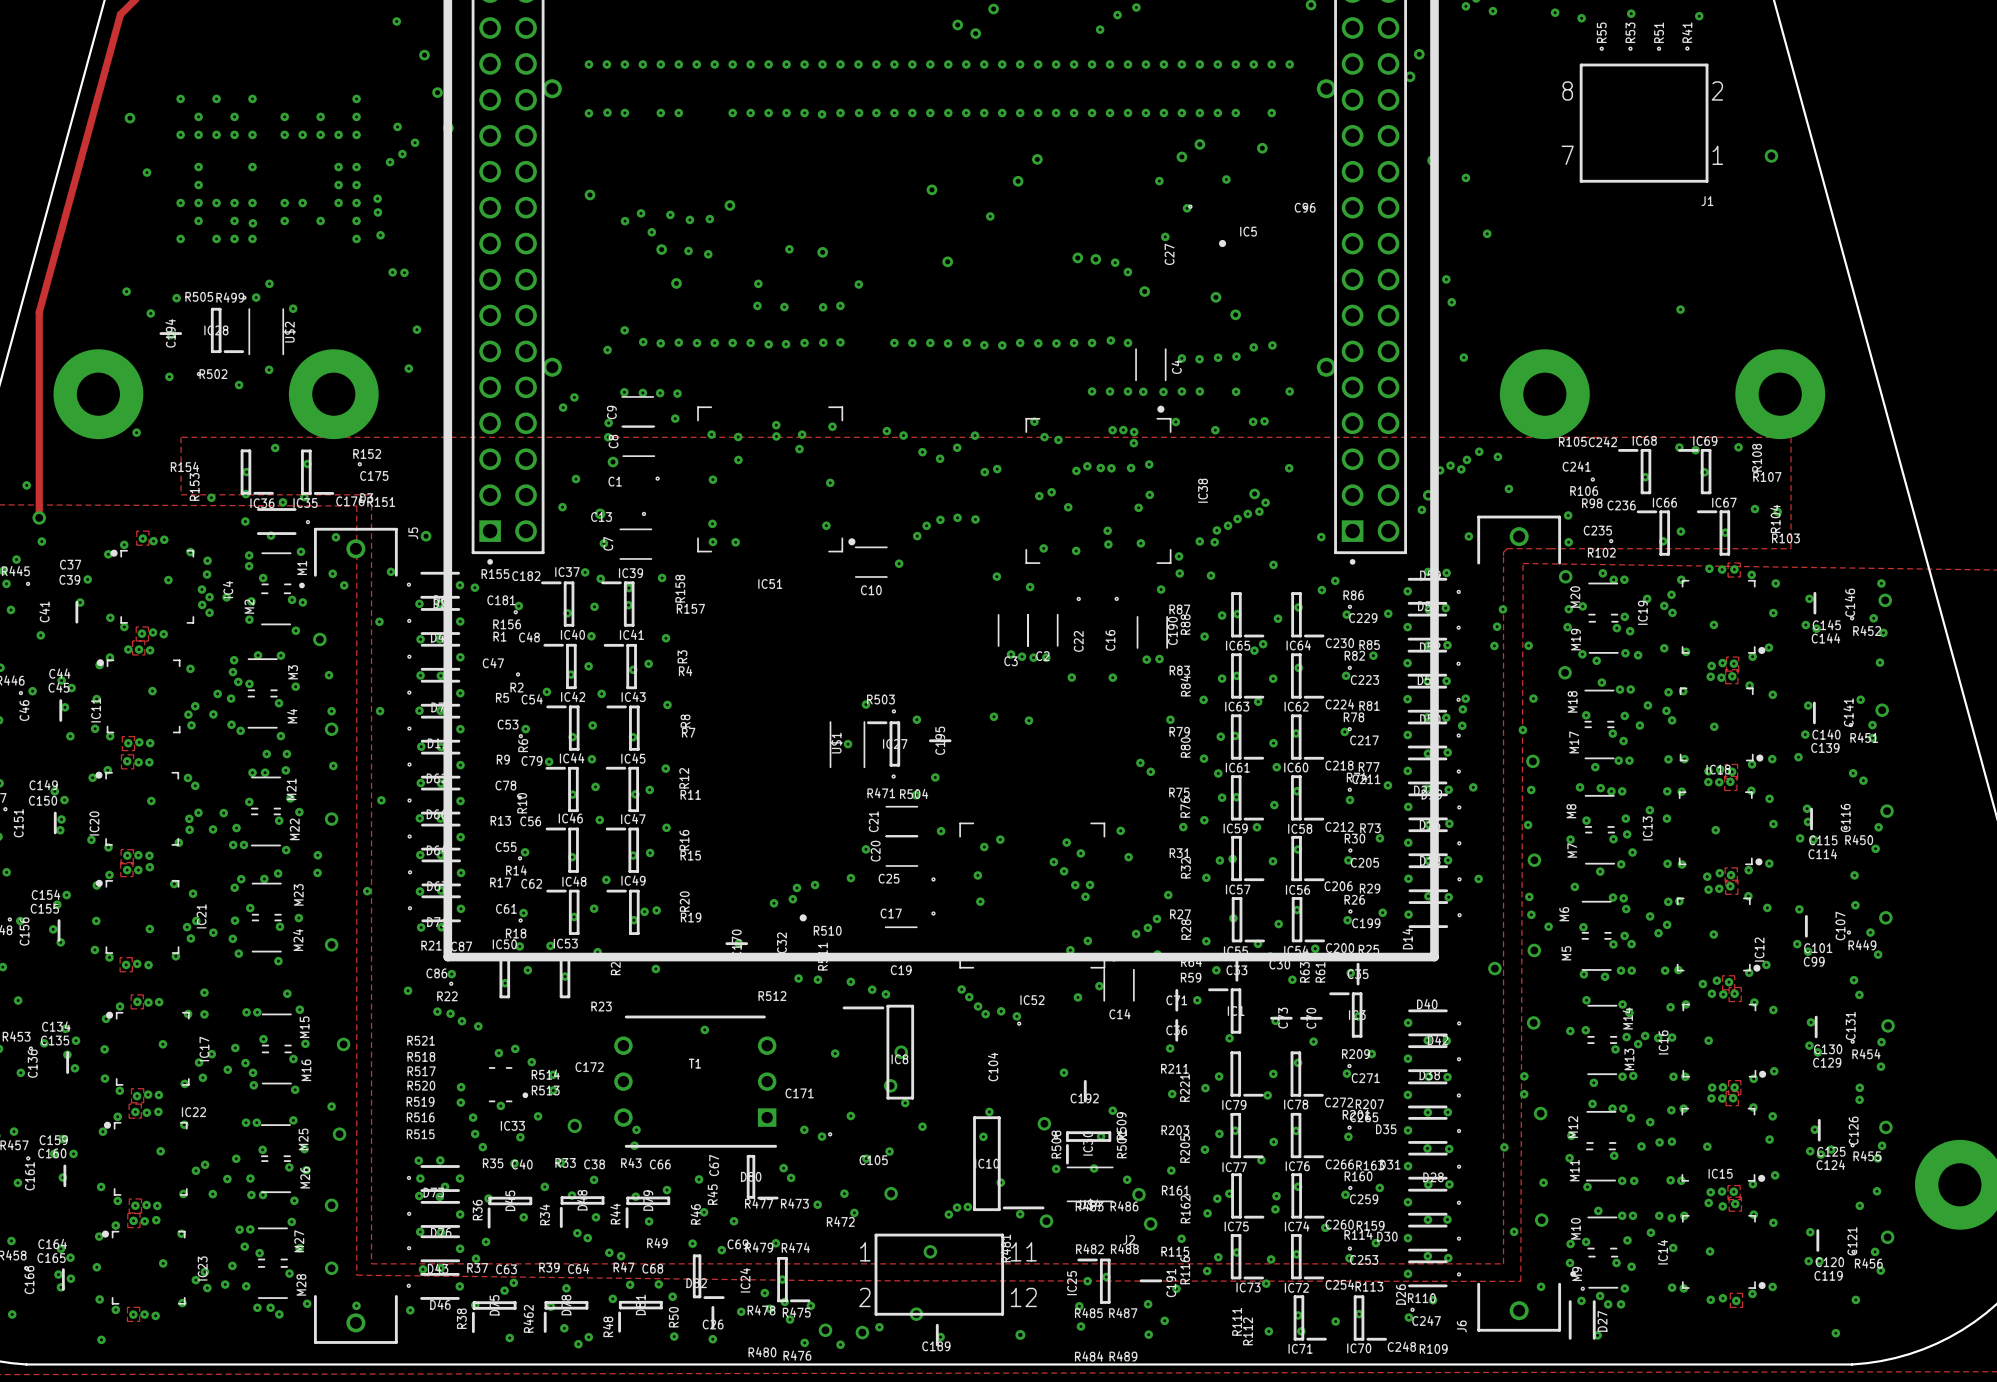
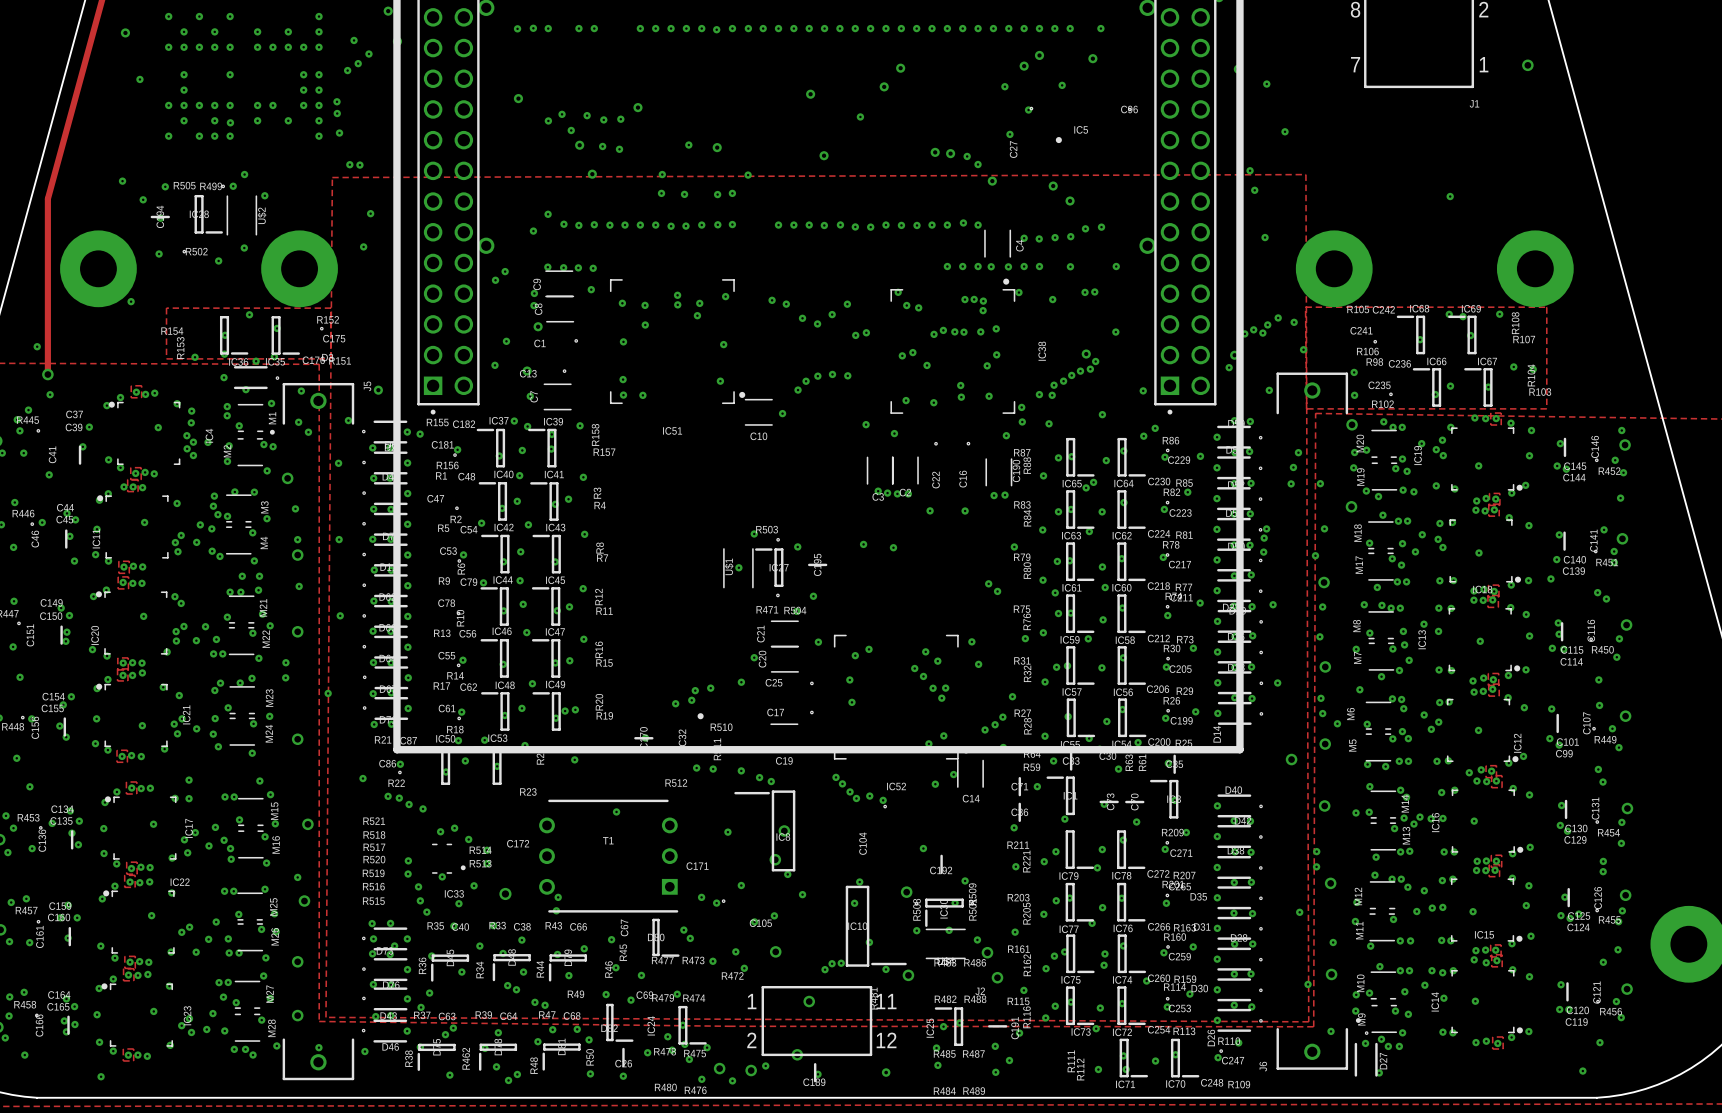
zone outline: (181, 437) (1791, 437) (1791, 548) (1507, 548) (1503, 552) (1503, 1263) (371, 1263) (371, 494) (181, 494) (181, 437) -> (1305, 174) (332, 177) (325, 1017) (1308, 1021) (1305, 174)
zone outline: none -> (1305, 307) (1546, 307) (1546, 408) (1306, 408) (1305, 307)
zone outline: none -> (166, 308) (331, 308) (330, 358) (166, 358) (166, 308)

